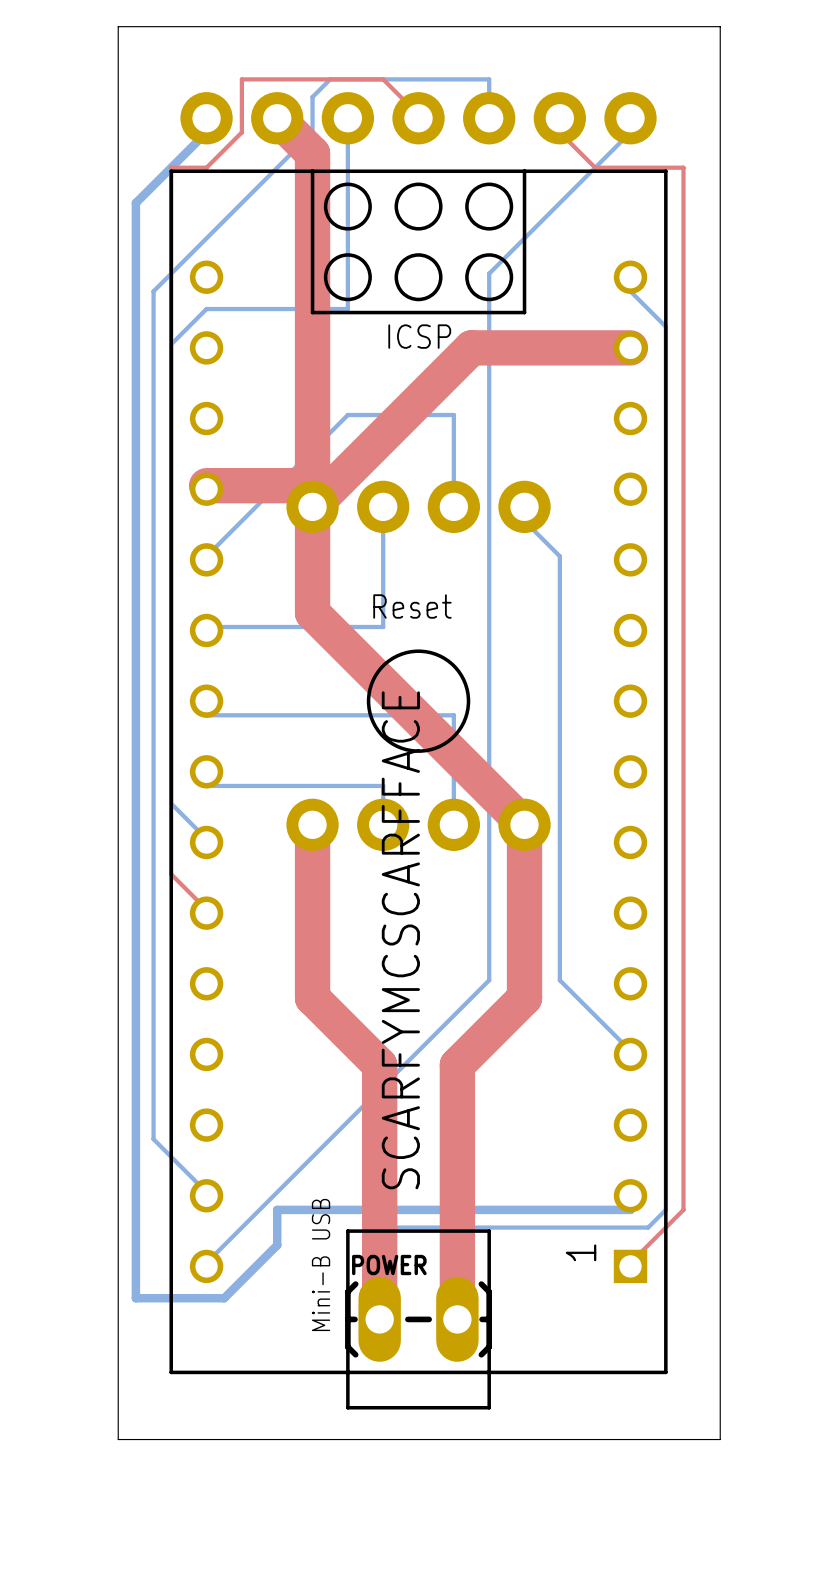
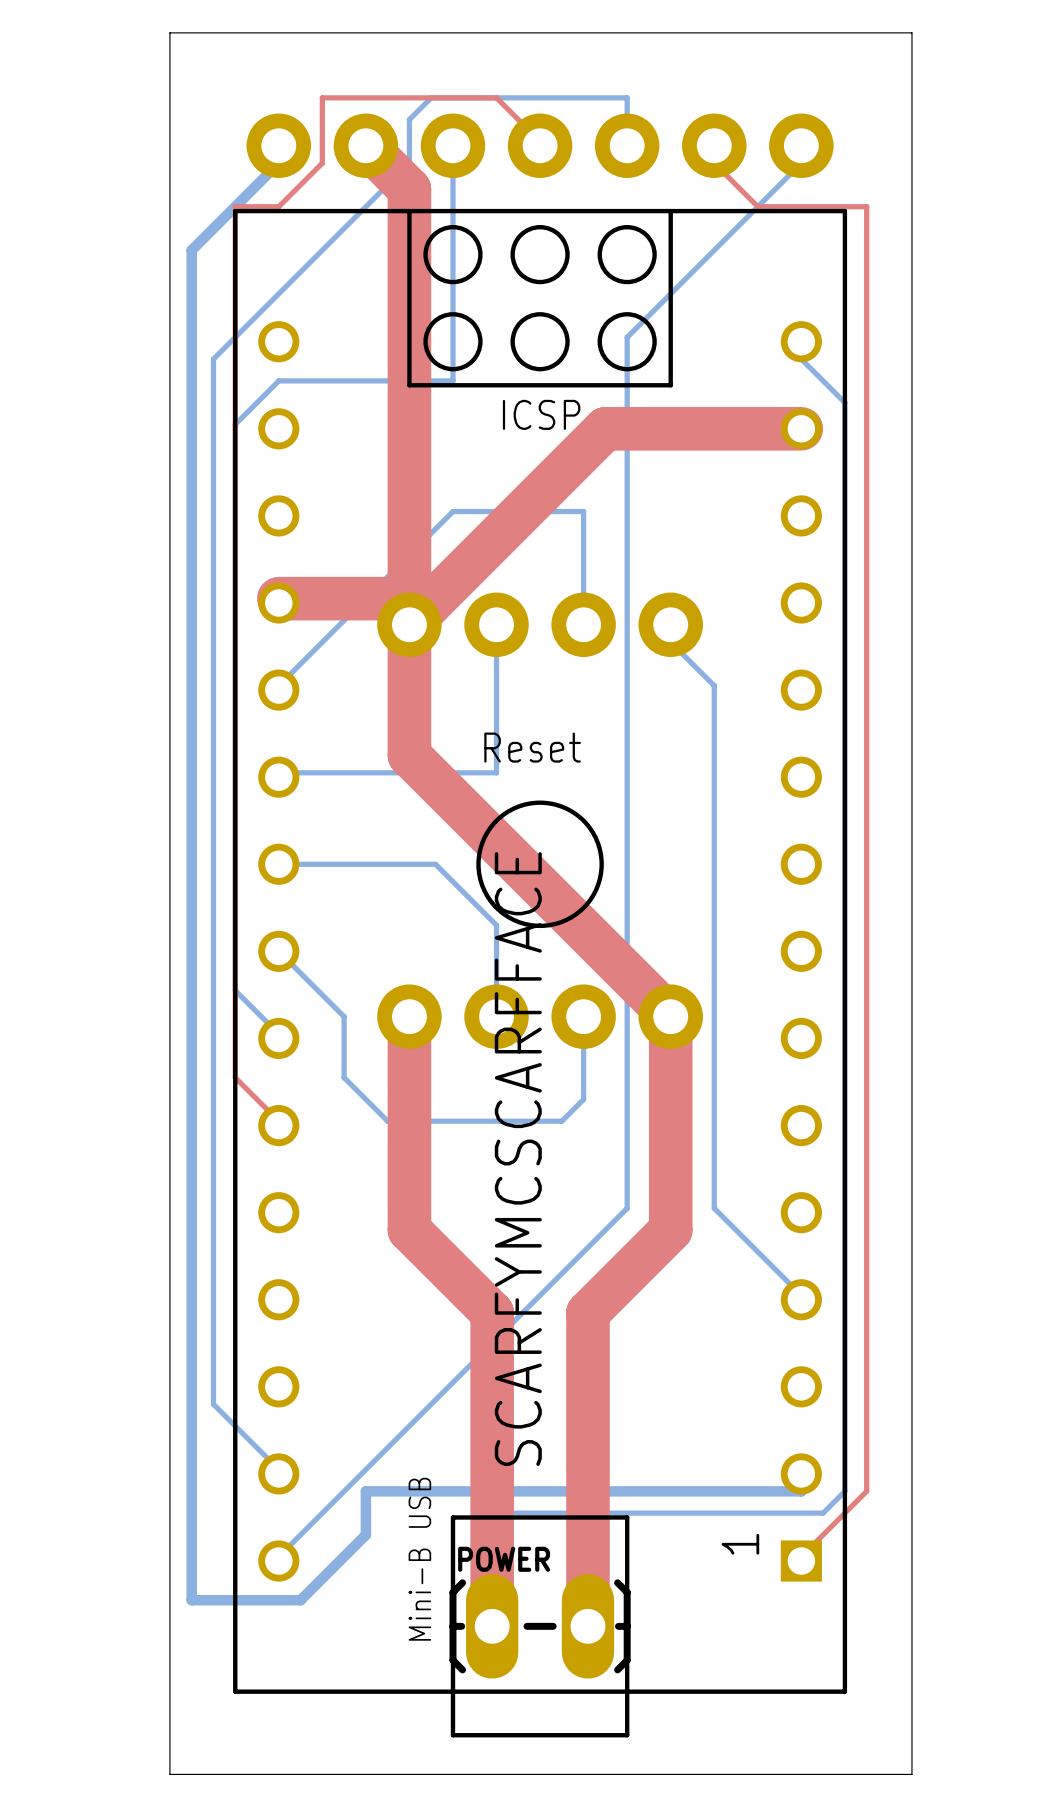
bottom track: (206, 701) (206, 715) (453, 715) (453, 824) -> (278, 951) (344, 1016) (344, 1077) (387, 1121) (561, 1121) (583, 1099) (583, 1016)
bottom track: (206, 771) (206, 785) (383, 785) -> (278, 864) (435, 864) (496, 925) (496, 968)

